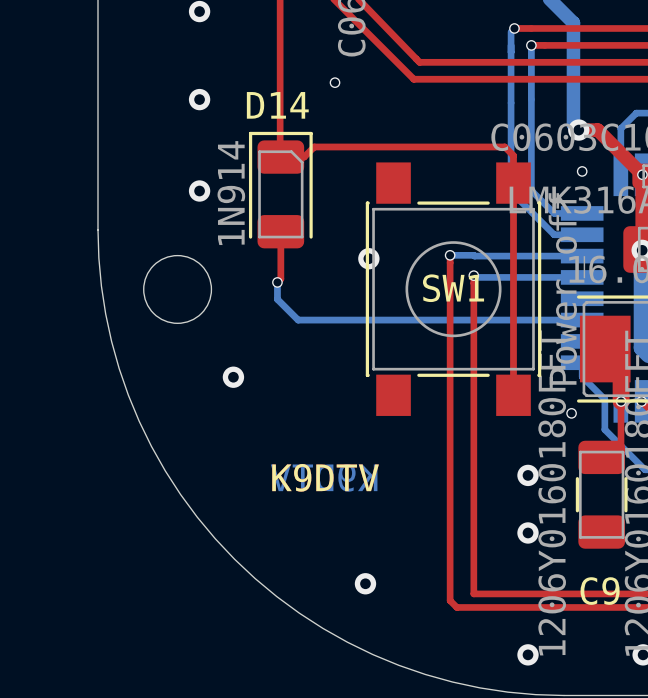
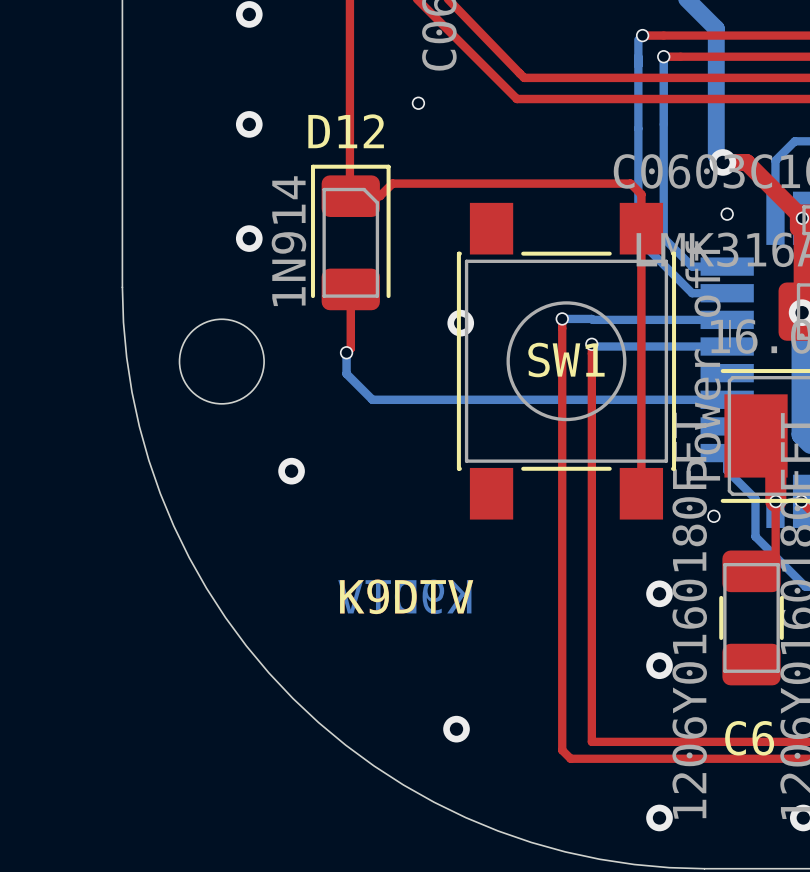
D14 name: D14 (277, 105) -> D12 (346, 131)
C9 name: C9 (600, 591) -> C6 (749, 738)

